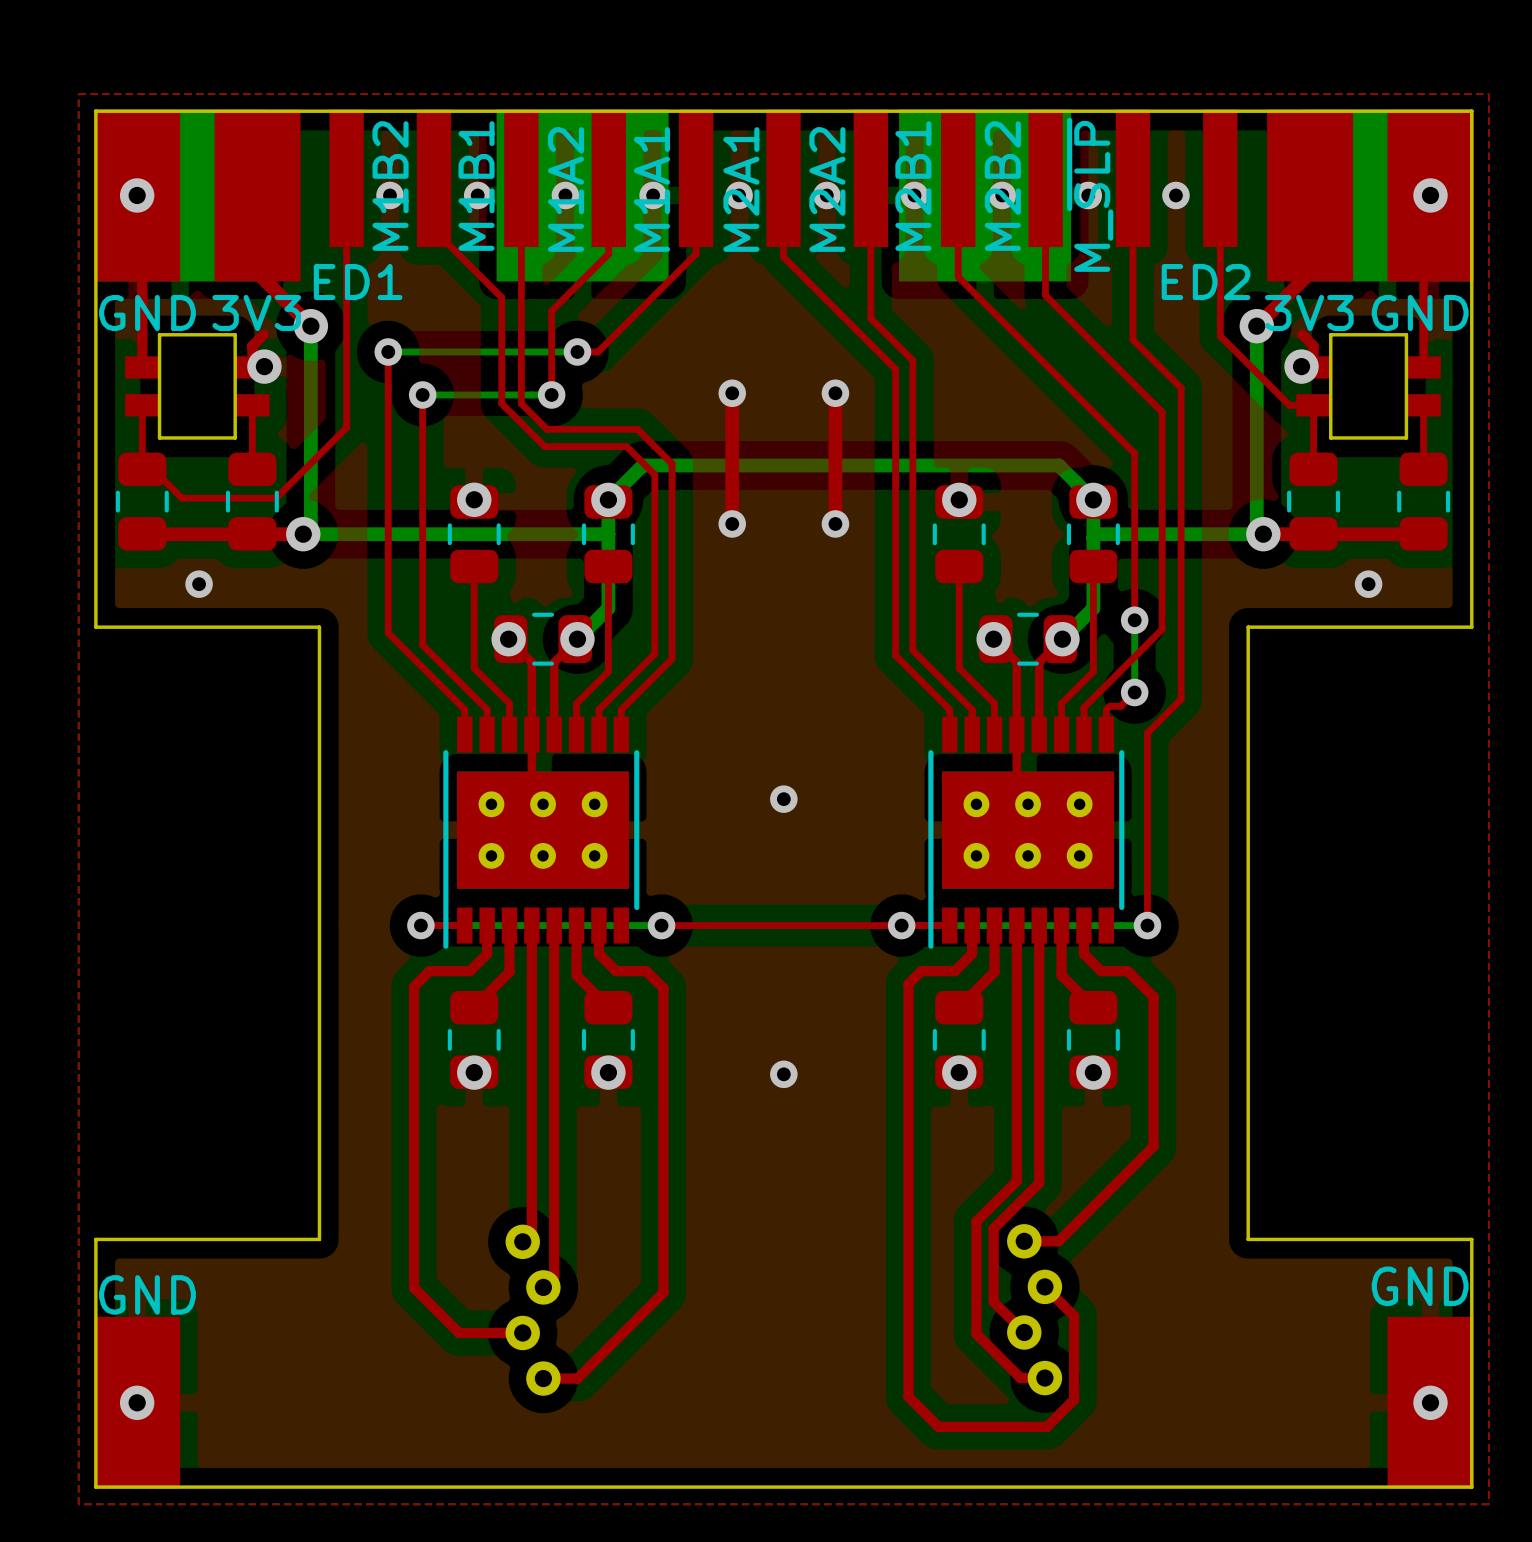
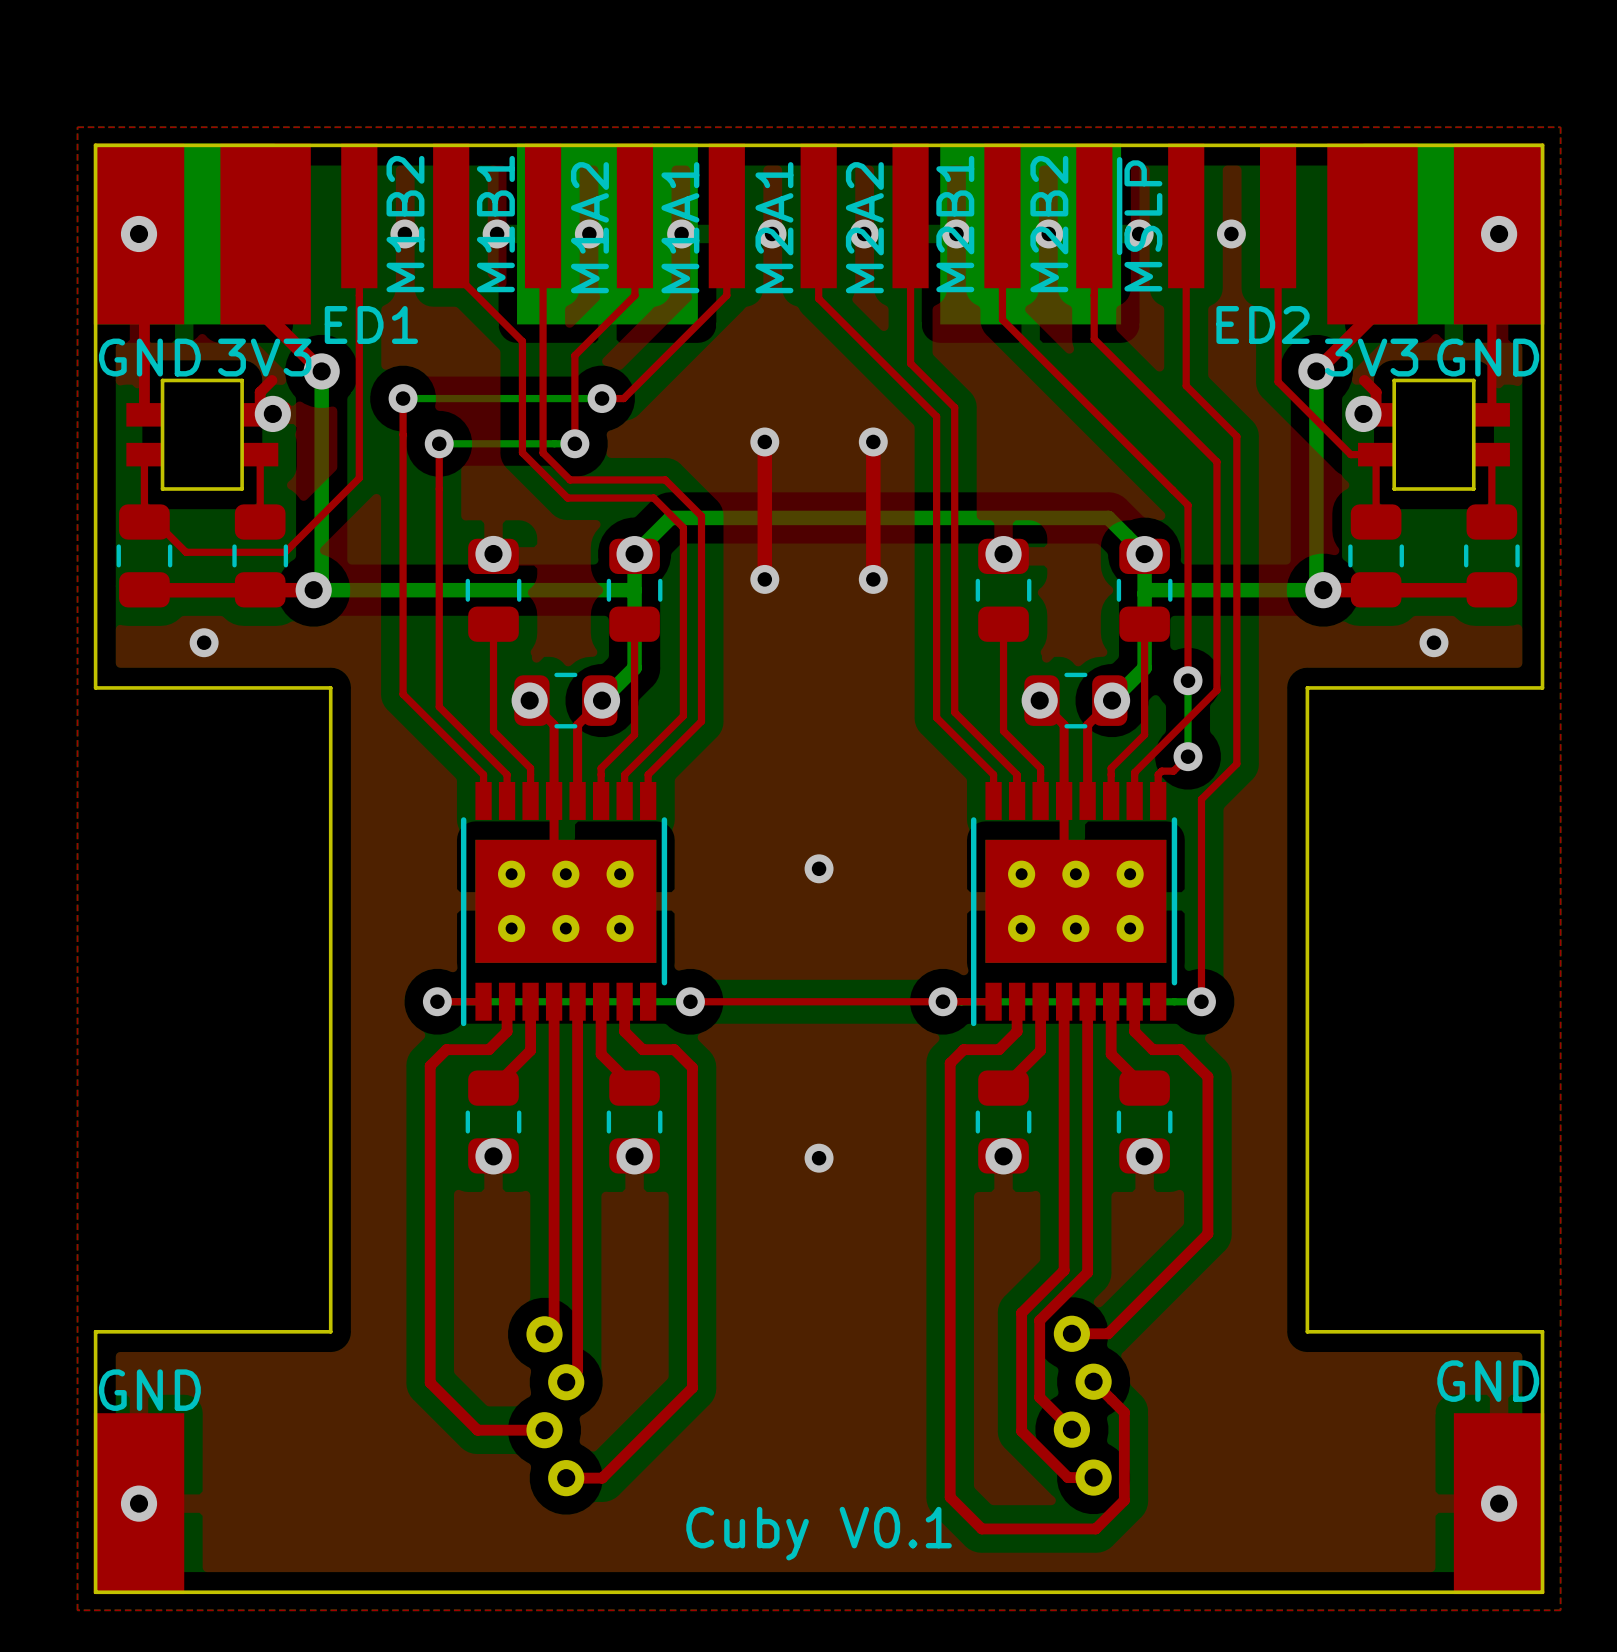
part value: M_~{SLP} (1090, 194) -> M~{SLP} (1139, 224)
text: none -> Cuby V0.1 (819, 1533)

